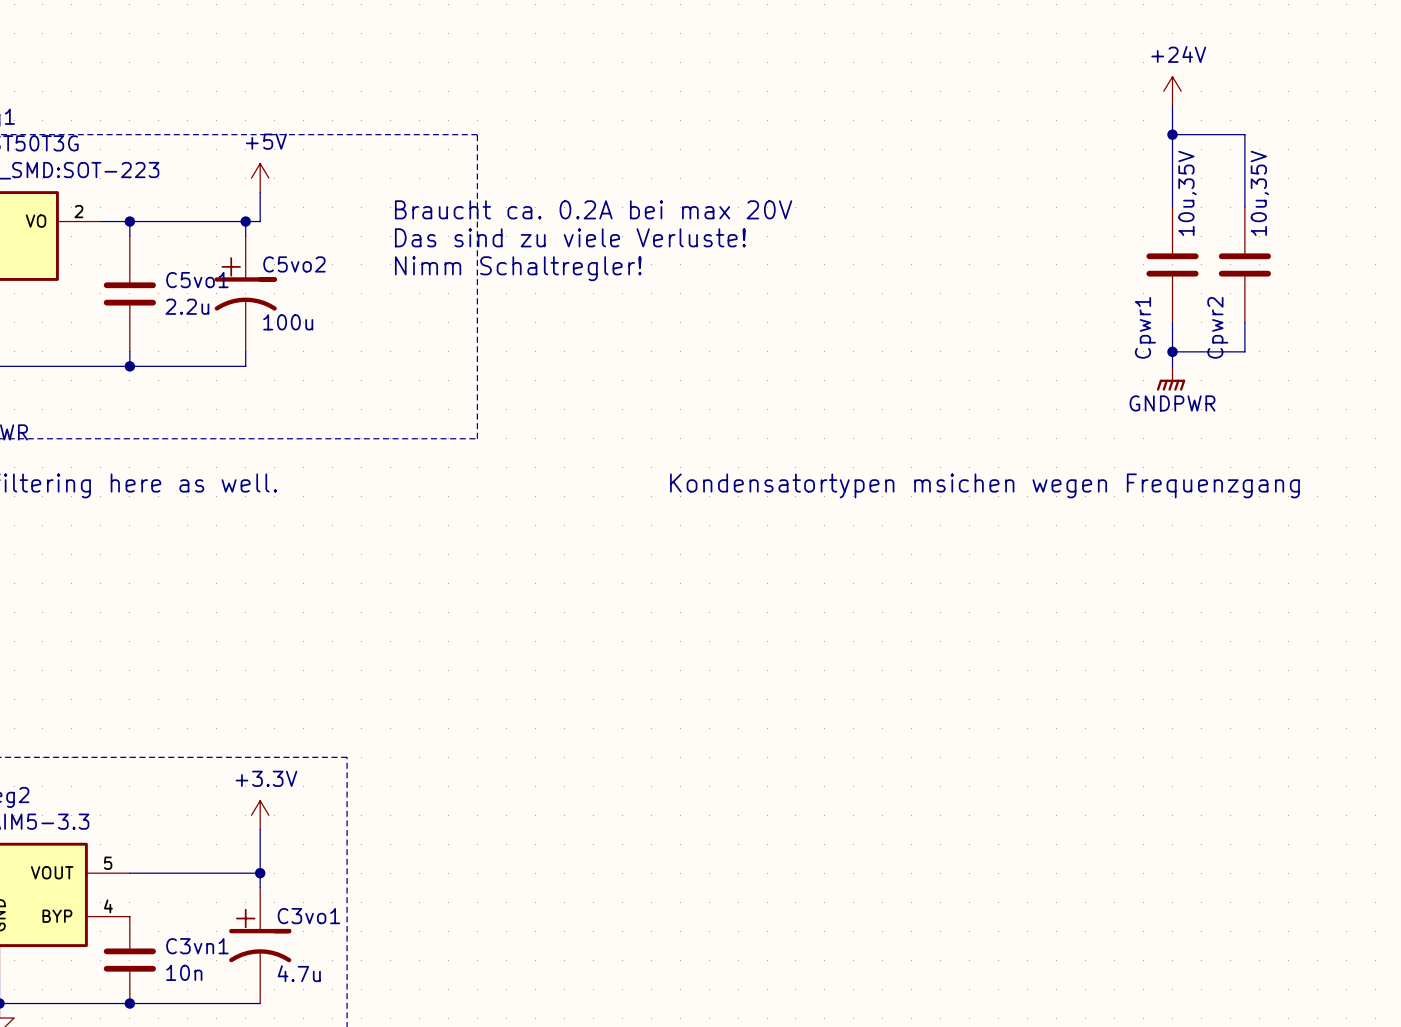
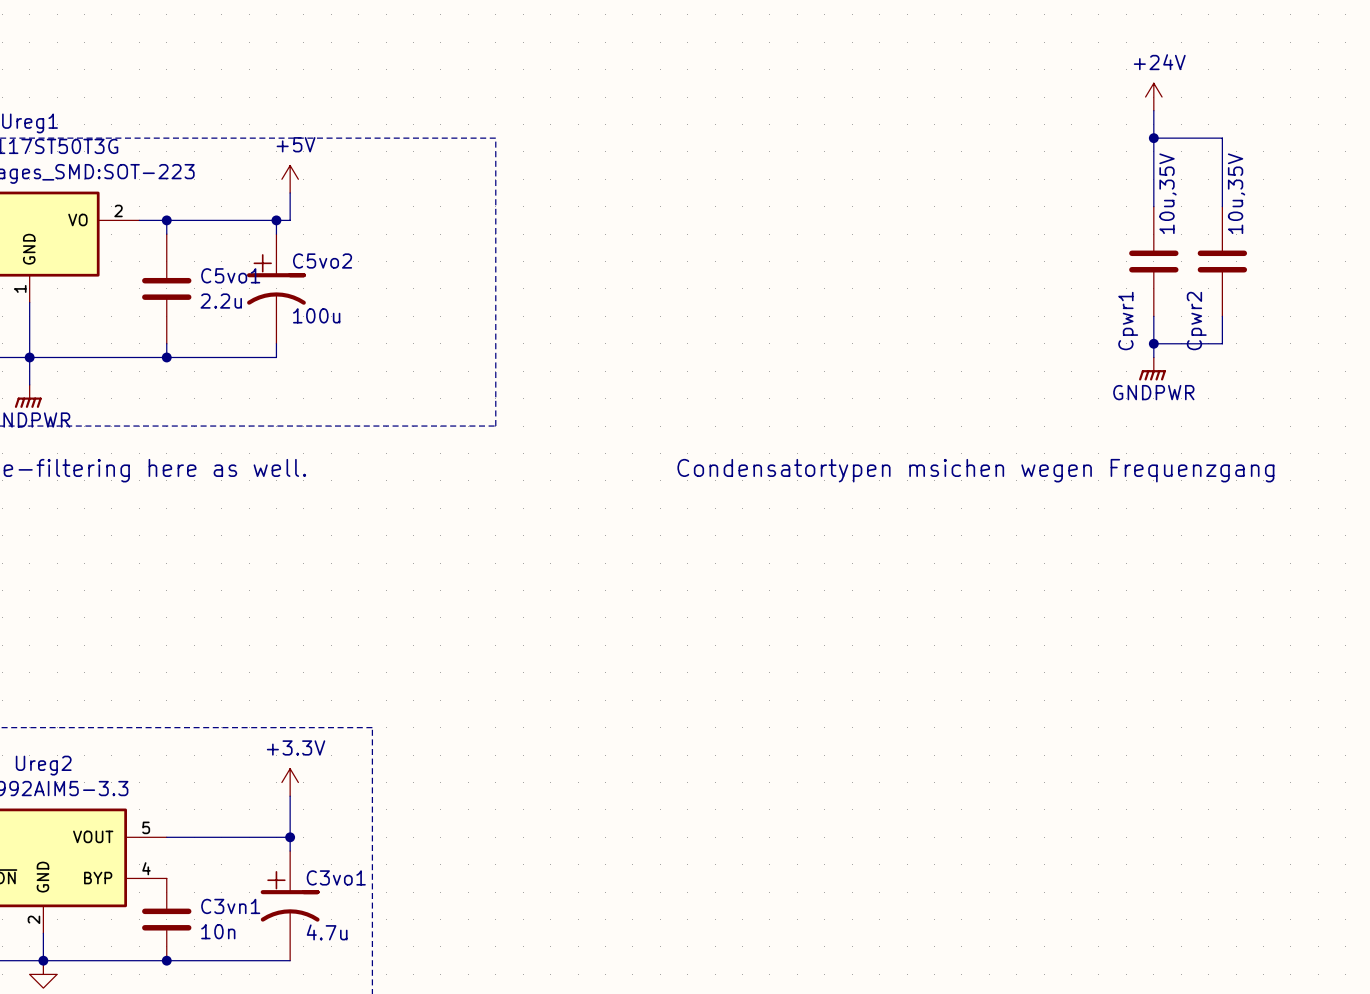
text: Braucht ca. 0.2A bei max 20V (593, 209) -> none
text: Das sind zu viele Verluste! (570, 237) -> none
text: Nimm Schaltregler! (518, 268) -> none
text: Kondensatortypen msichen wegen Frequenzgang (984, 485) -> Condensatortypen msichen wegen Frequenzgang (975, 470)

